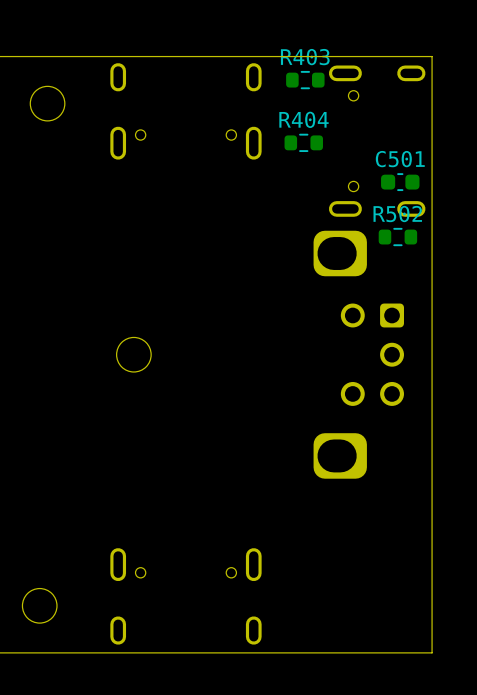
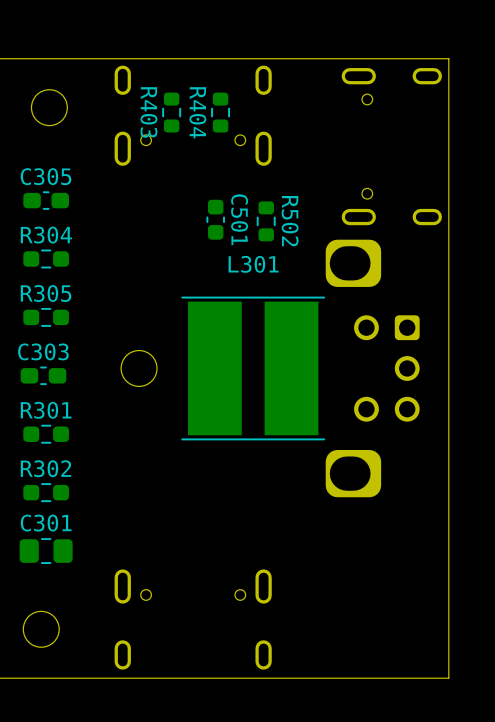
R403 name position: R403 (305, 57) -> R403 (148, 112)
R403 rotation: 0° (305, 80) -> 90° clockwise (171, 112)
R403 position: (305, 80) -> (171, 112)
R404 name position: R404 (303, 119) -> R404 (197, 112)
R404 rotation: 0° (303, 142) -> 90° clockwise (220, 112)
R404 position: (303, 142) -> (220, 112)
C501 rotation: 0° (400, 182) -> 90° clockwise (215, 219)
C501 position: (400, 182) -> (215, 219)
C305: none -> (46, 200)
R502 rotation: 0° (397, 237) -> 90° clockwise (266, 221)
R502 position: (397, 237) -> (266, 221)
R304: none -> (46, 258)
R305: none -> (46, 317)
L301: none -> (253, 368)
C303: none -> (43, 375)
R301: none -> (46, 434)
R302: none -> (46, 492)
C301: none -> (46, 551)

